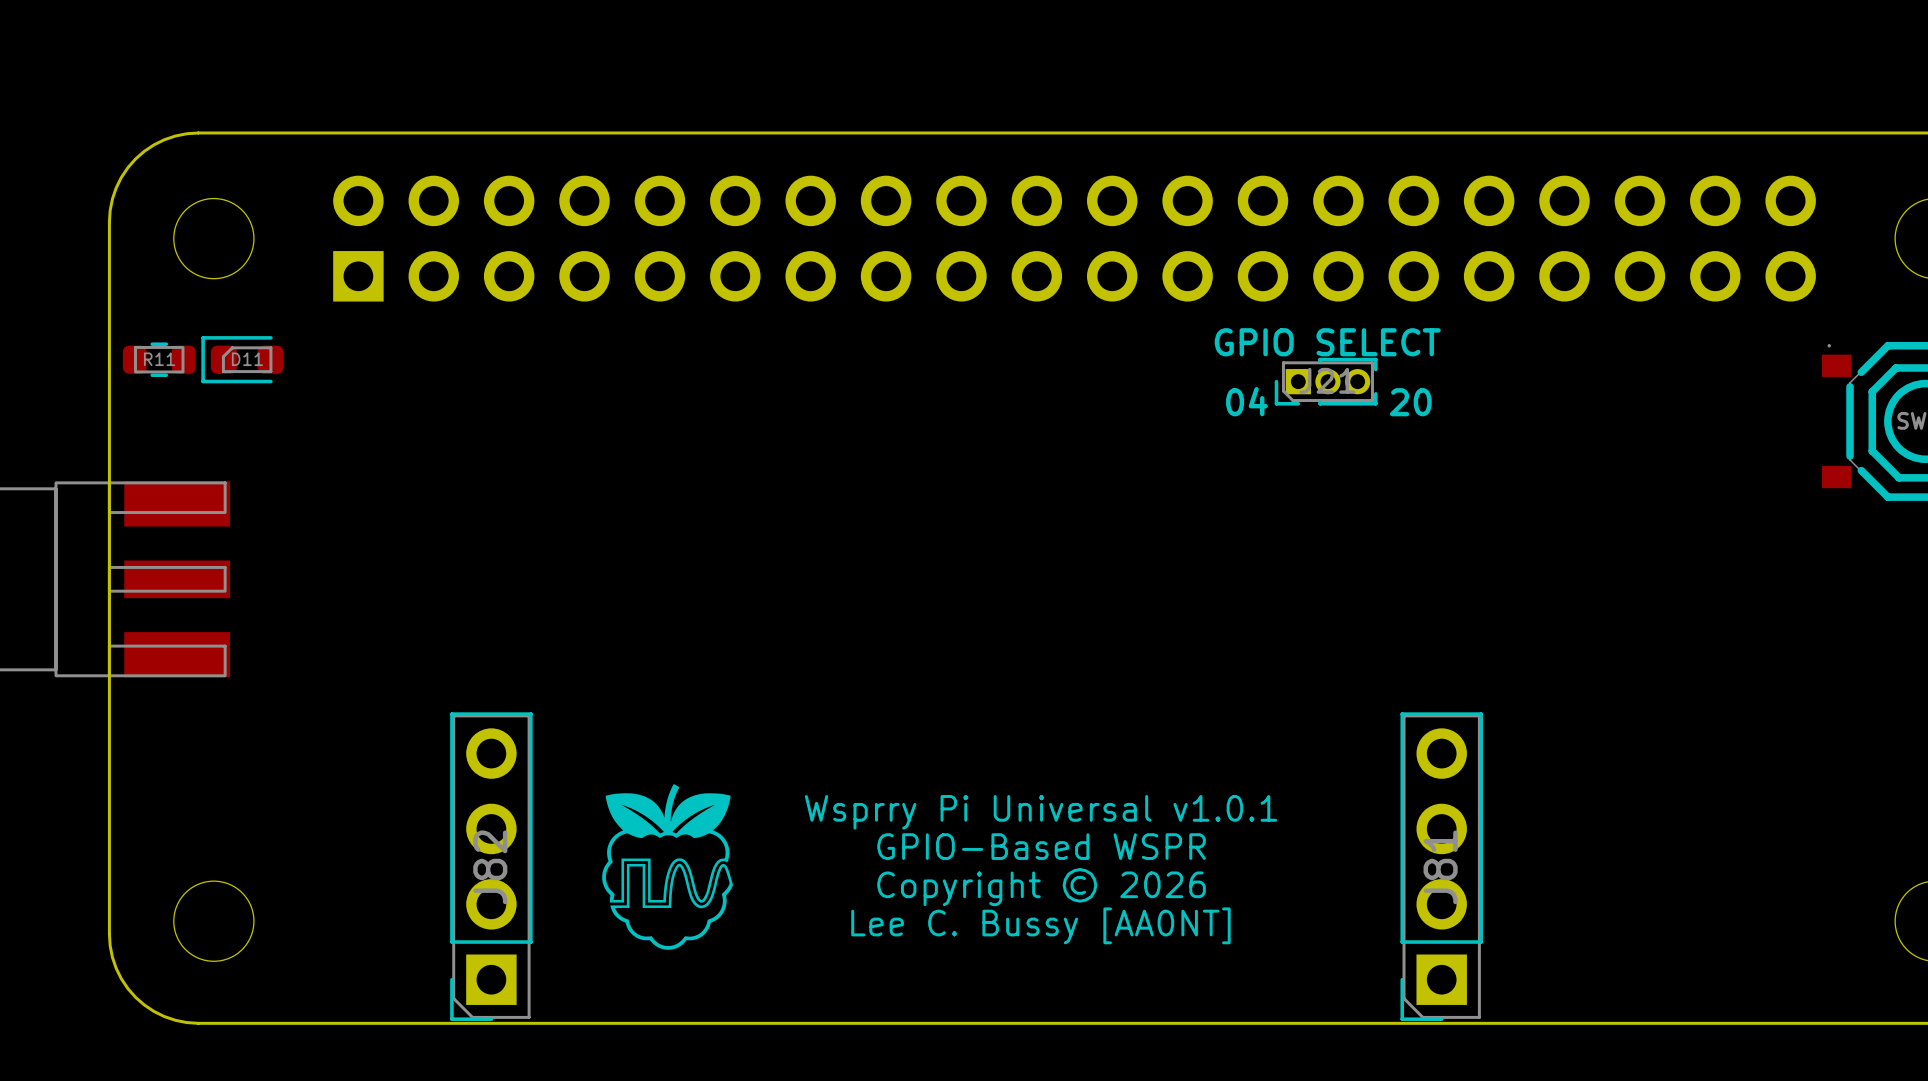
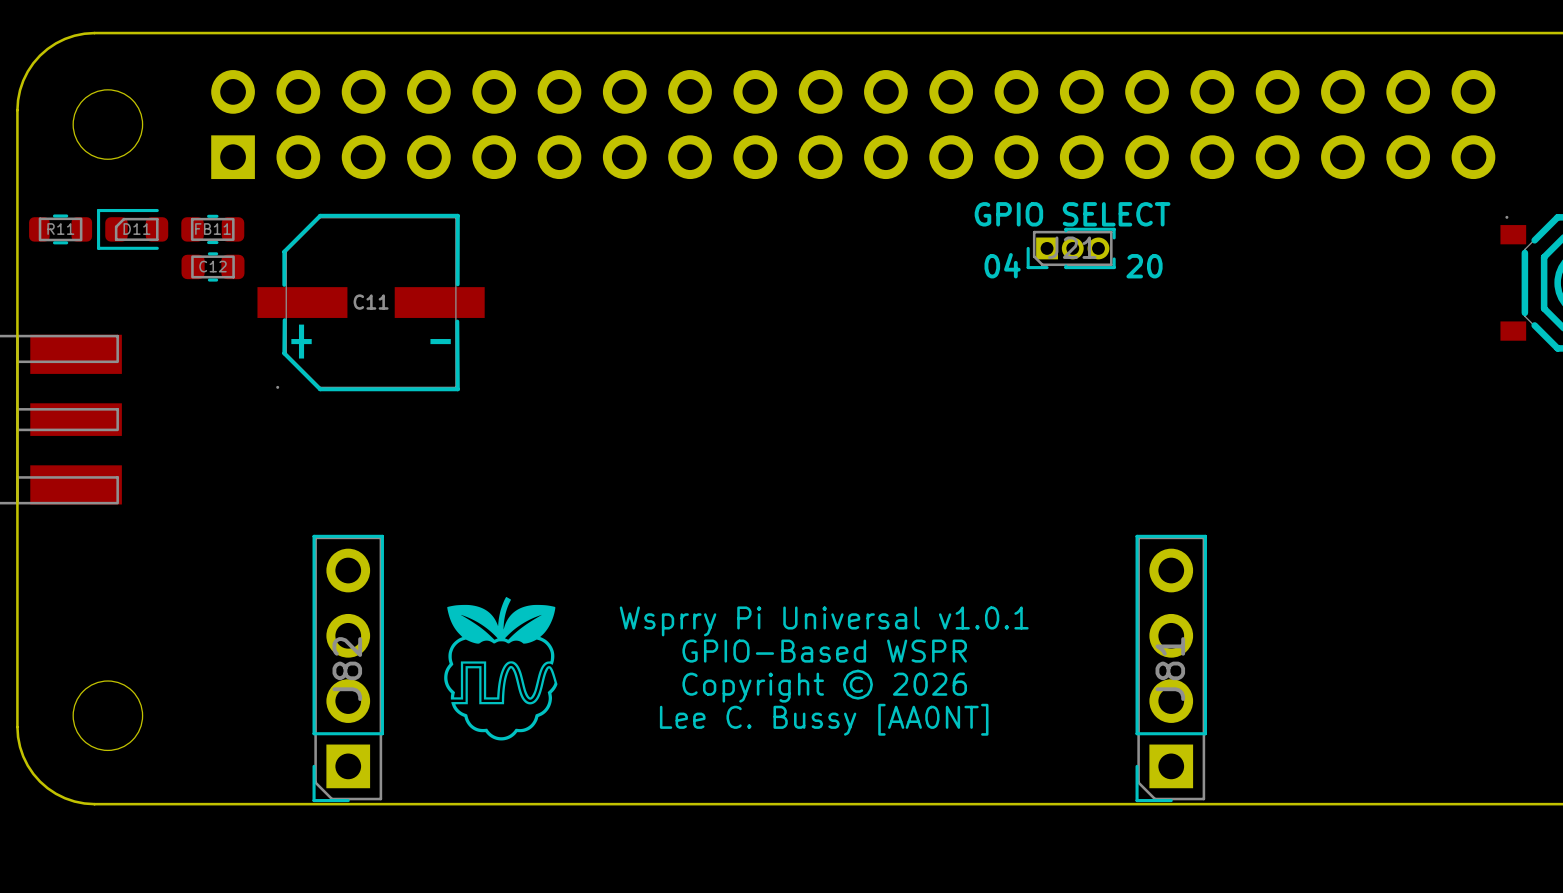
FB11: none -> (212, 229)
C12: none -> (213, 266)
C11: none -> (371, 302)

